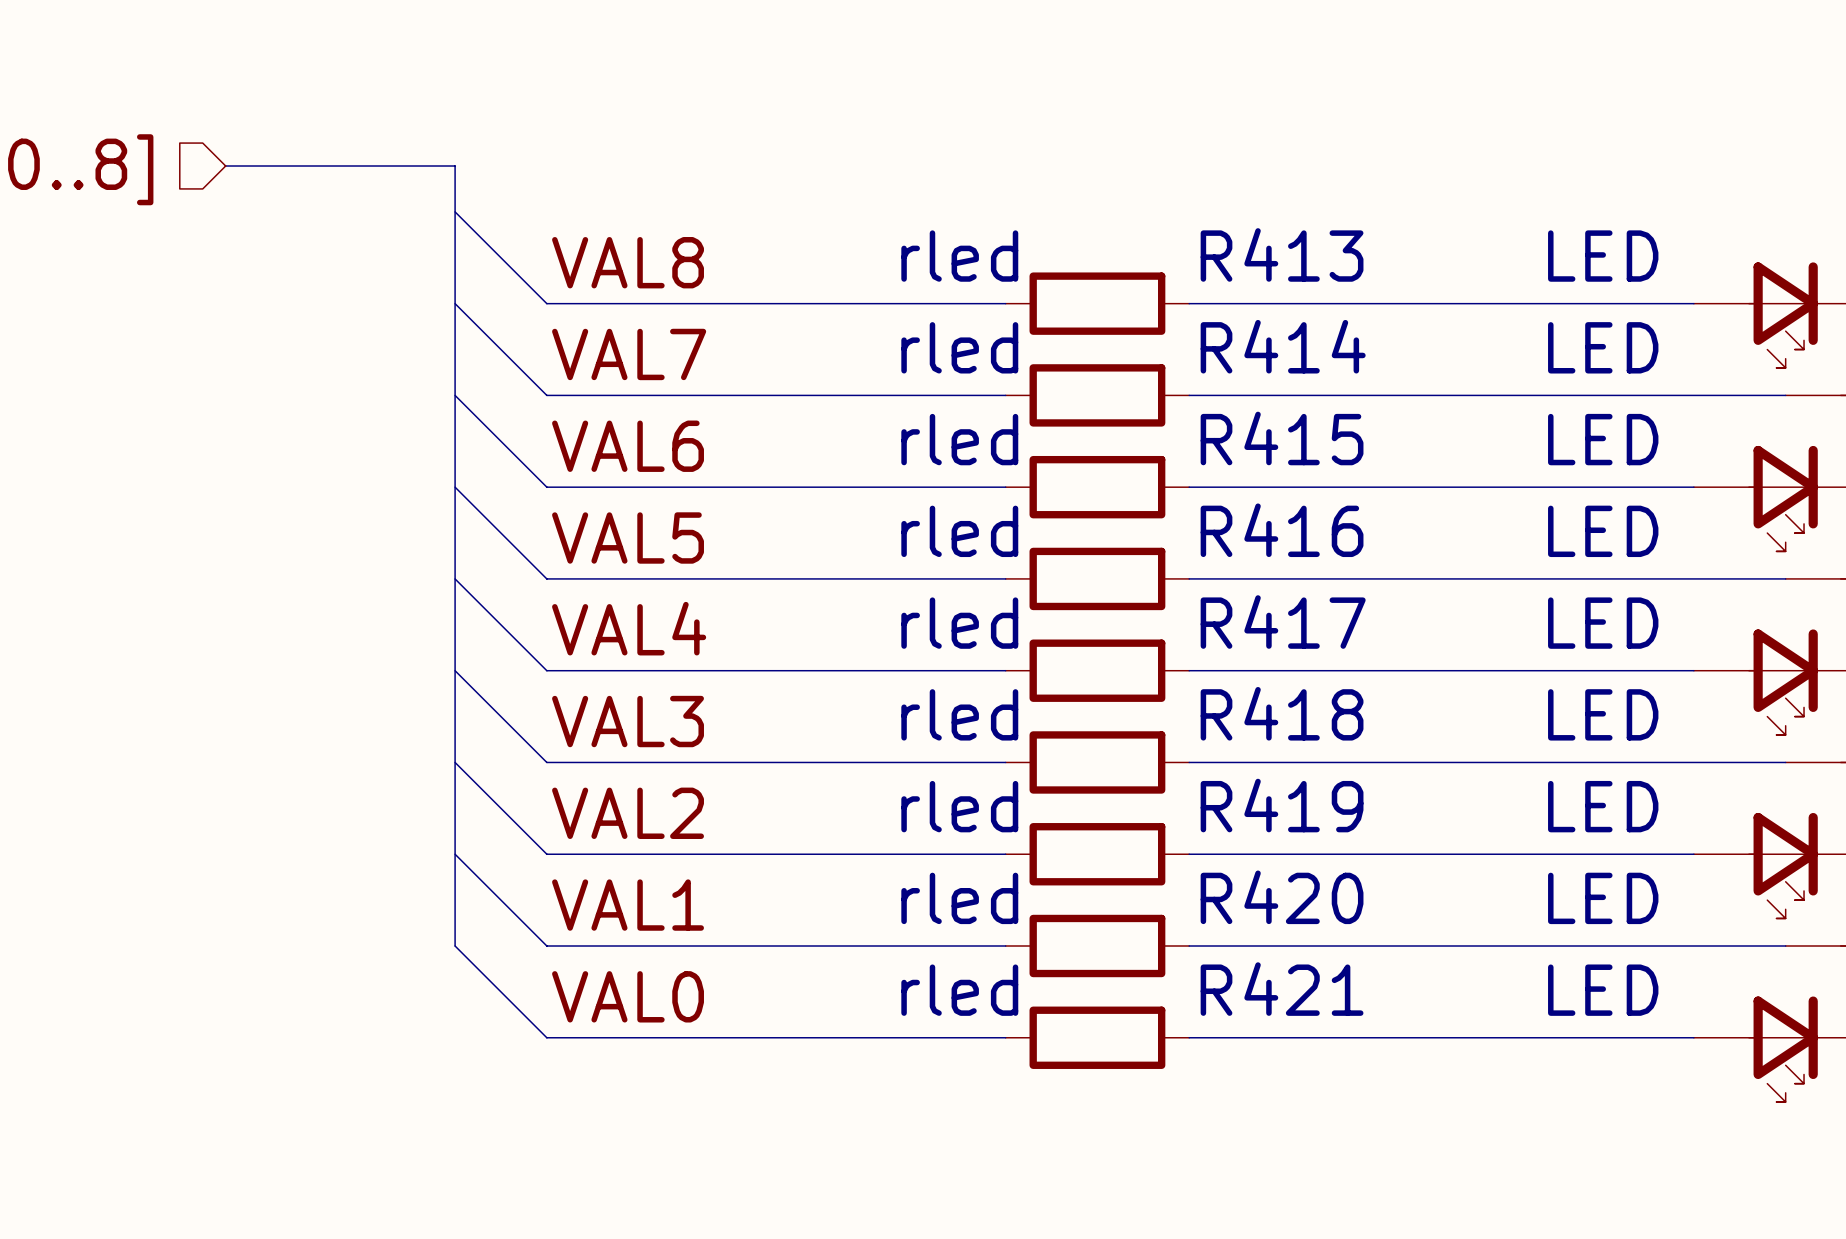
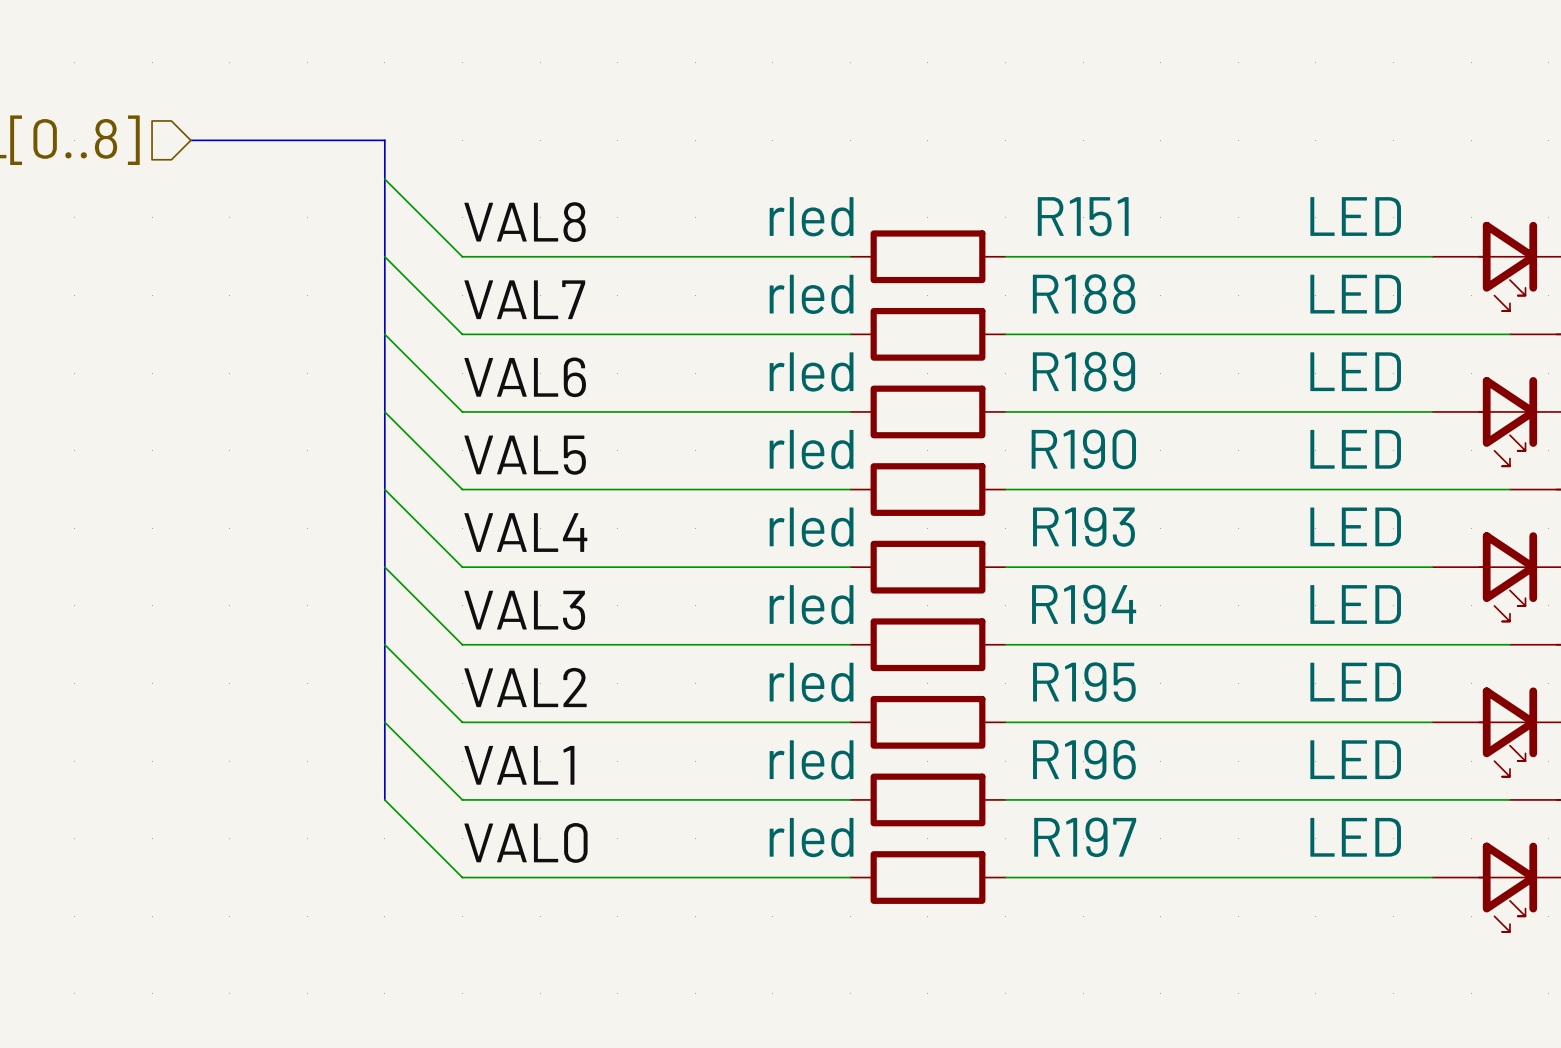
R413 name: R413 (1282, 254) -> R151 (1083, 216)
R414 name: R414 (1283, 346) -> R188 (1084, 294)
R415 name: R415 (1282, 438) -> R189 (1083, 371)
R416 name: R416 (1282, 530) -> R190 (1083, 449)
R417 name: R417 (1283, 622) -> R193 (1083, 526)
R418 name: R418 (1282, 713) -> R194 (1084, 604)
R419 name: R419 (1282, 805) -> R195 (1084, 682)
R420 name: R420 (1282, 897) -> R196 (1084, 759)
R421 name: R421 (1282, 989) -> R197 (1085, 837)

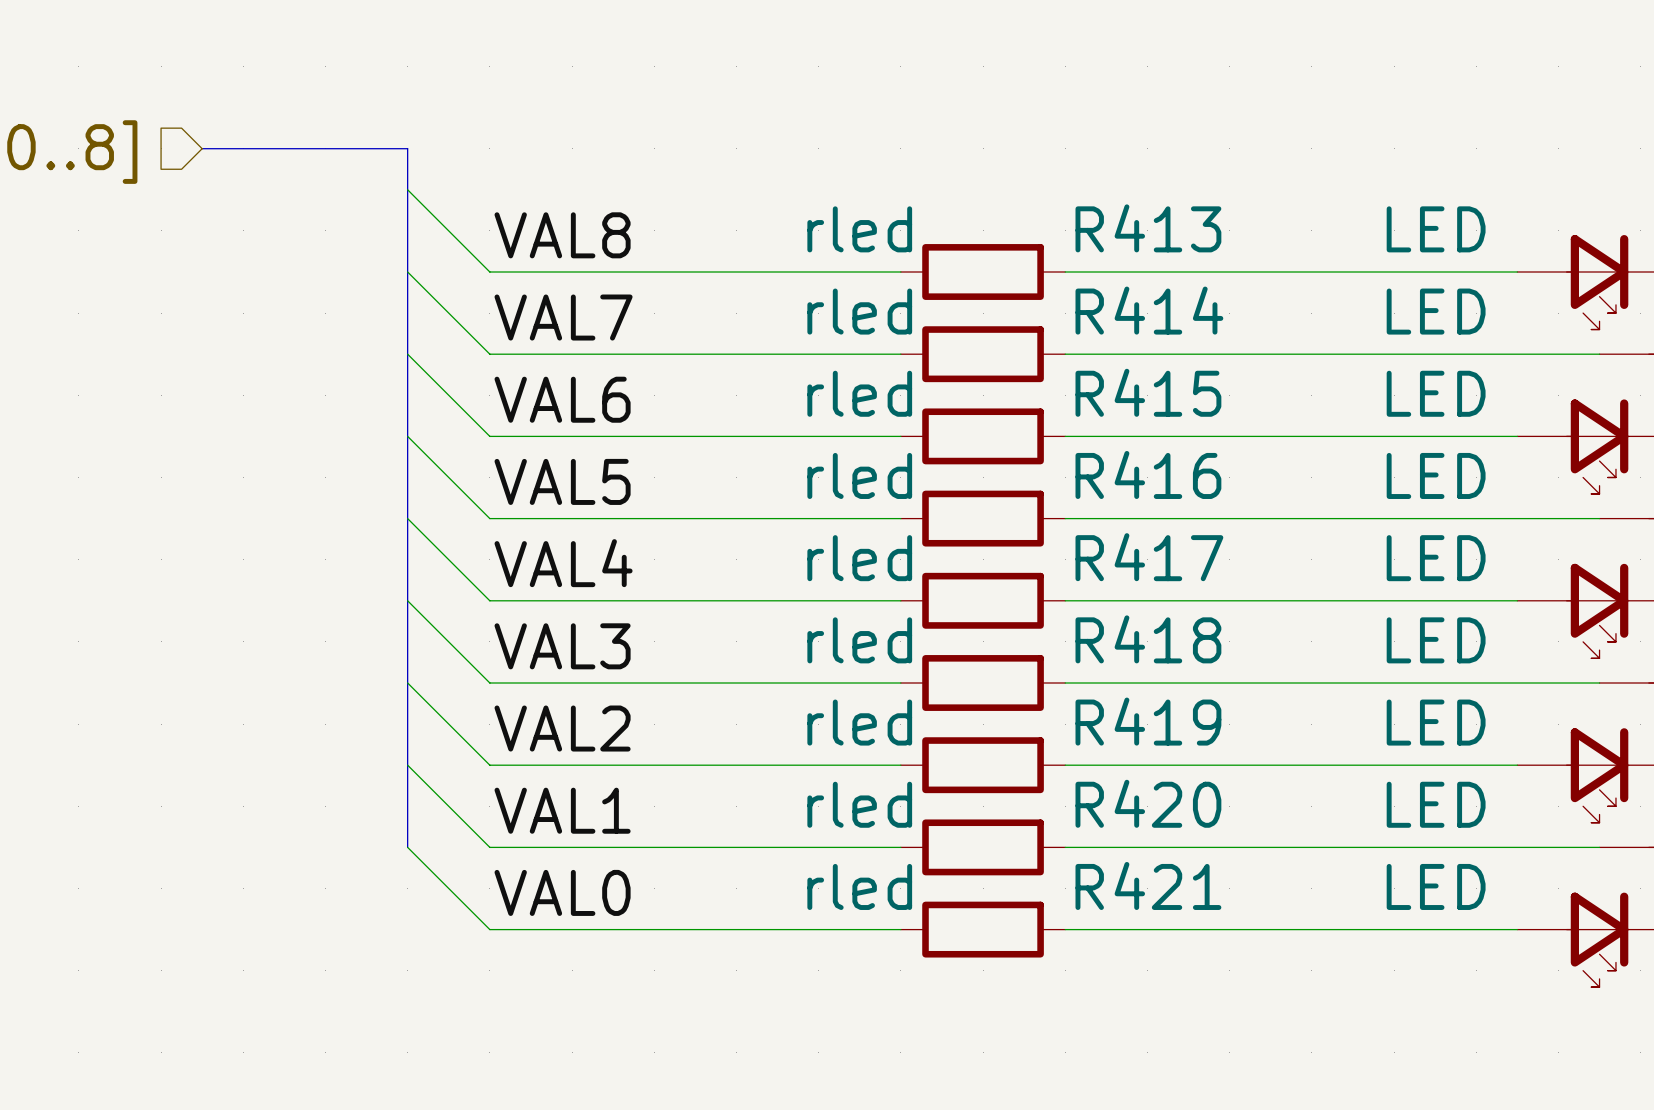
R151 name: R151 (1083, 216) -> R413 (1148, 228)
R188 name: R188 (1084, 294) -> R414 (1149, 310)
R189 name: R189 (1083, 371) -> R415 (1148, 392)
R190 name: R190 (1083, 449) -> R416 (1148, 474)
R193 name: R193 (1083, 526) -> R417 (1149, 557)
R194 name: R194 (1084, 604) -> R418 (1148, 639)
R195 name: R195 (1084, 682) -> R419 (1148, 721)
R196 name: R196 (1084, 759) -> R420 (1148, 803)
R197 name: R197 (1085, 837) -> R421 (1148, 885)

